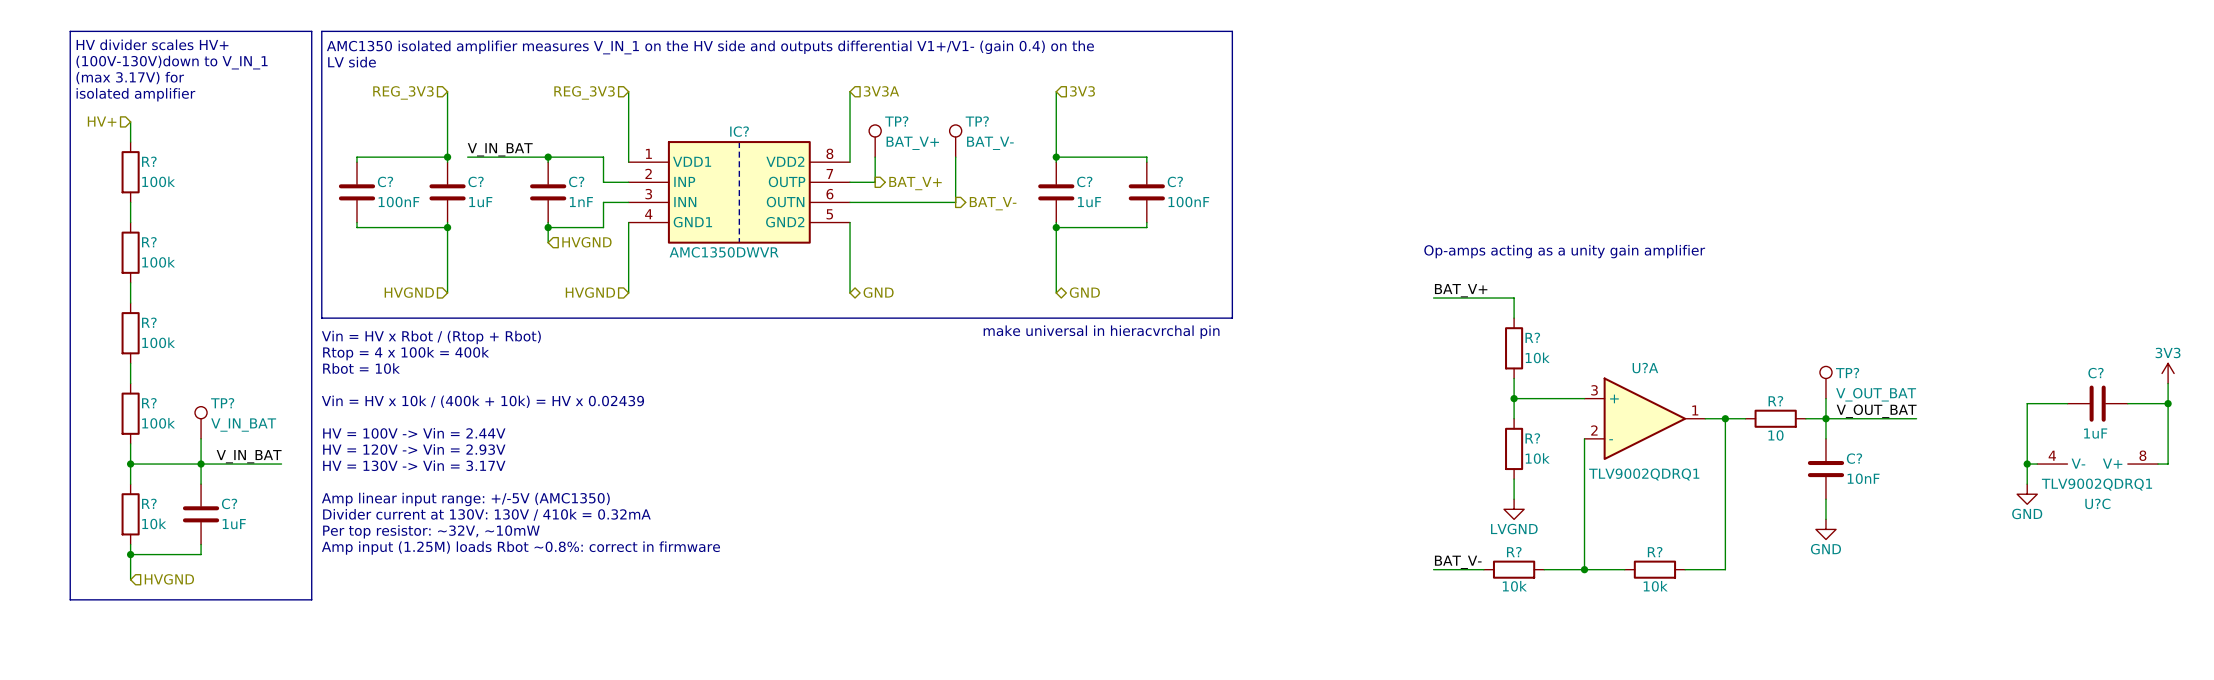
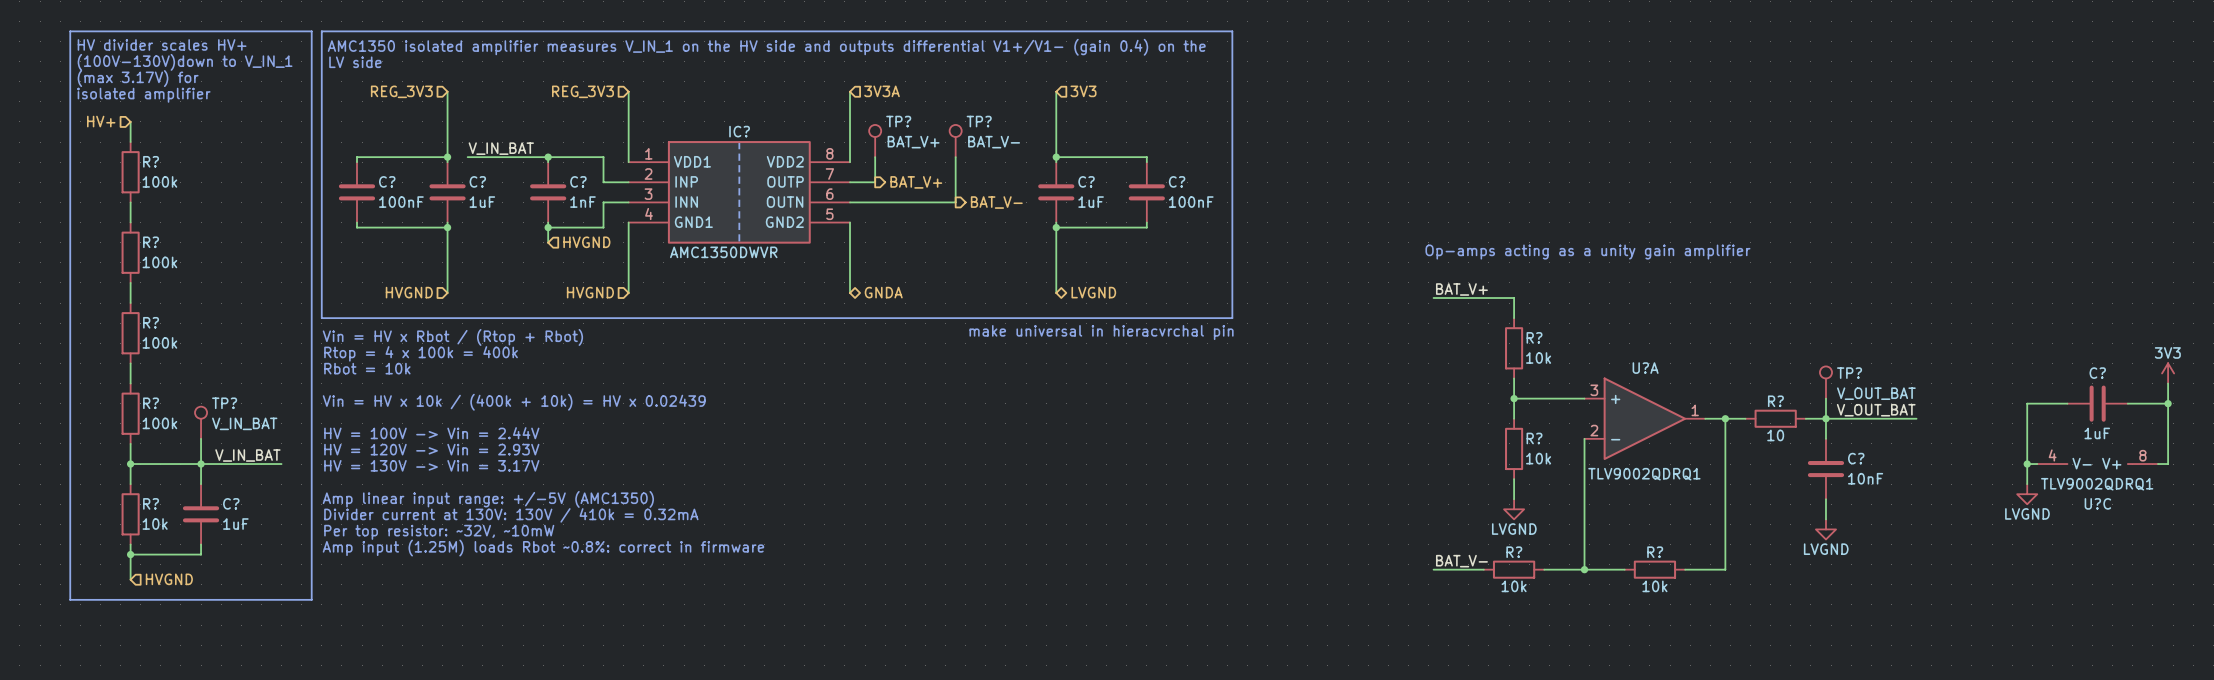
hierarchical label: GND (878, 292) -> GNDA (883, 292)
hierarchical label: GND (1084, 292) -> LVGND (1093, 292)
power symbol: GND (2027, 494) -> LVGND (2027, 494)
power symbol: GND (1825, 529) -> LVGND (1825, 529)

